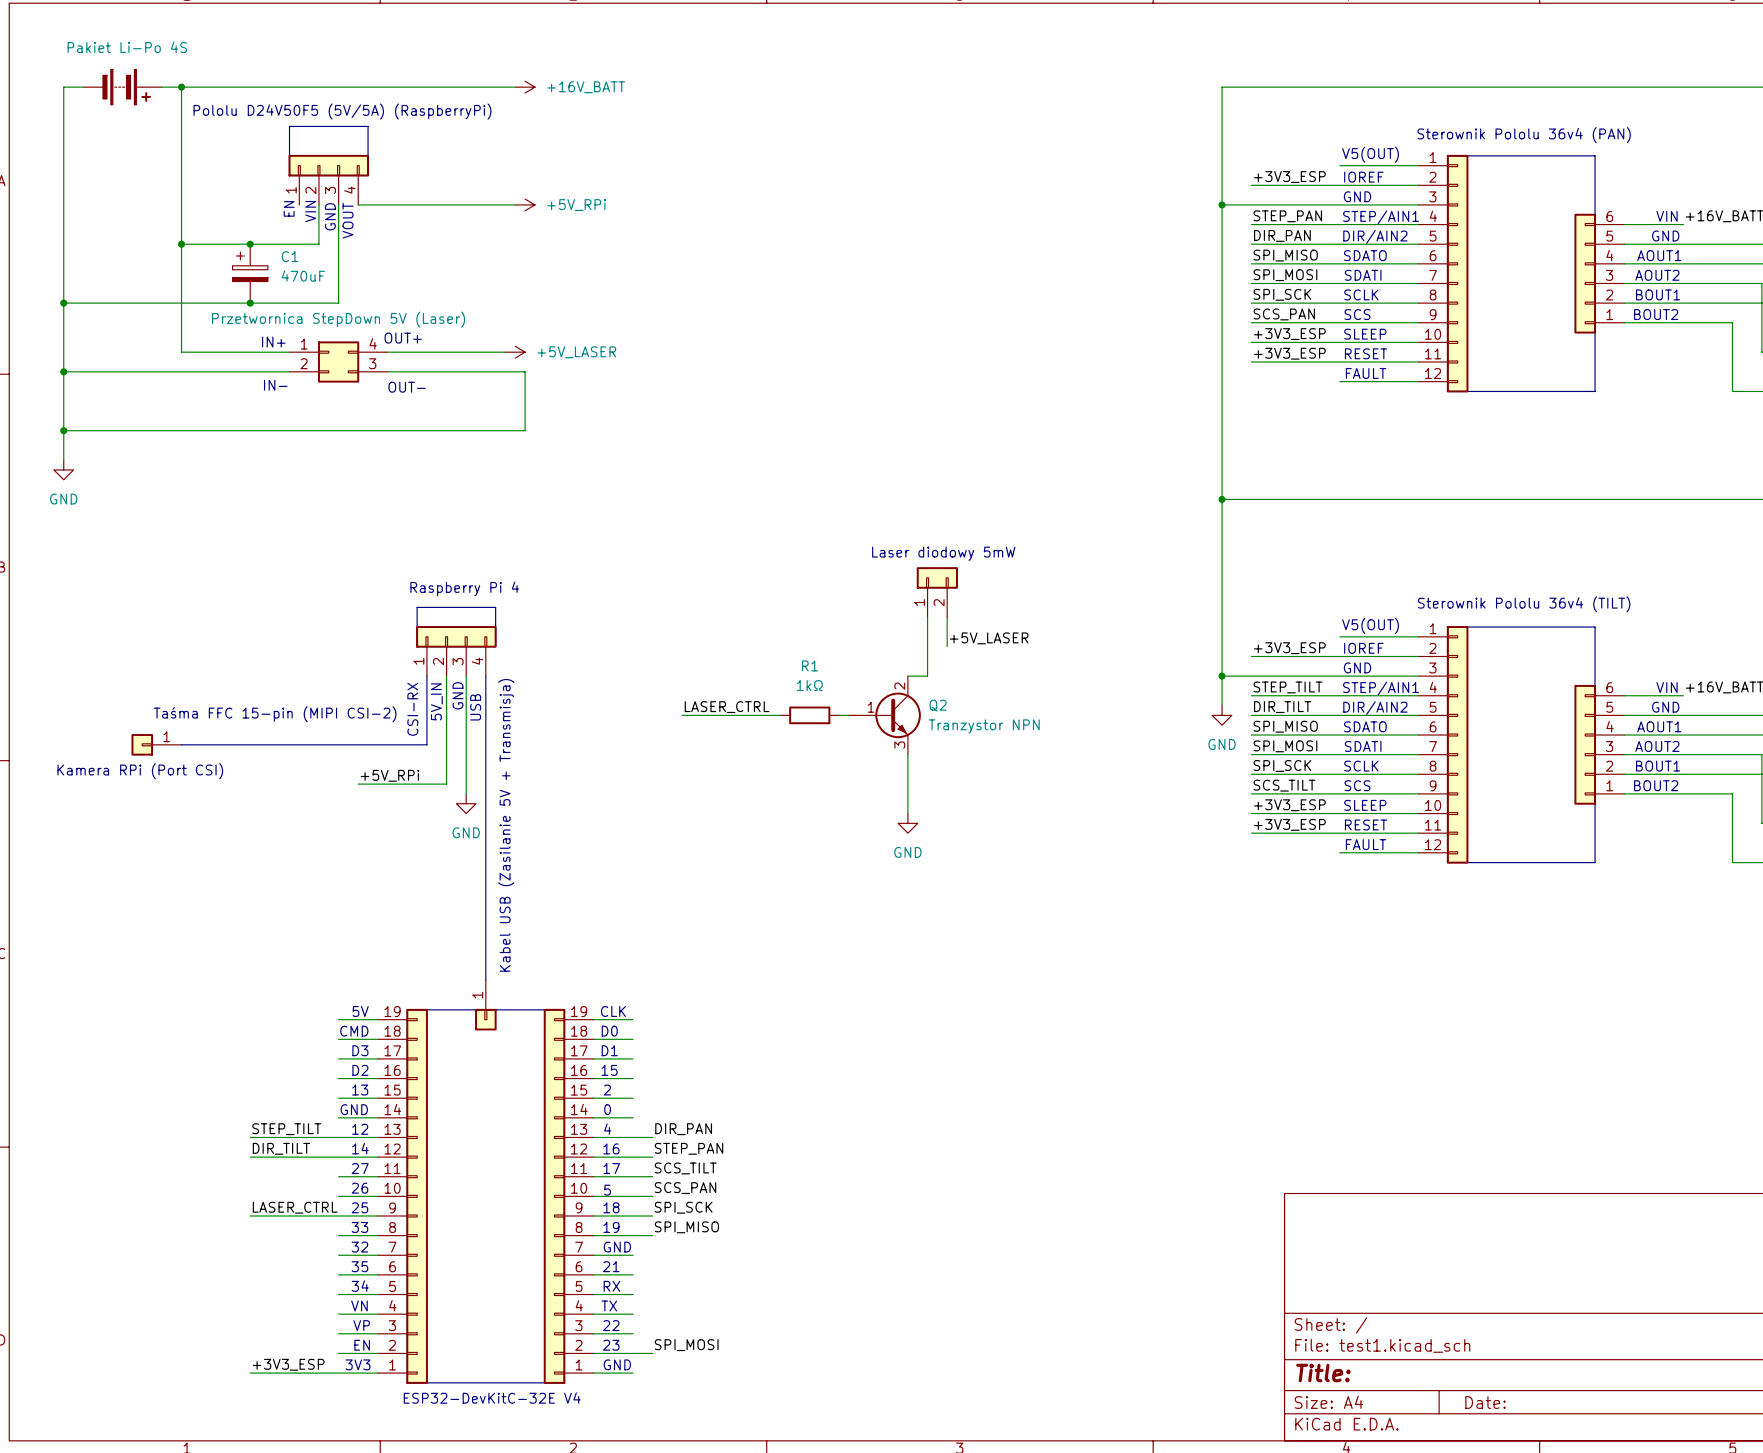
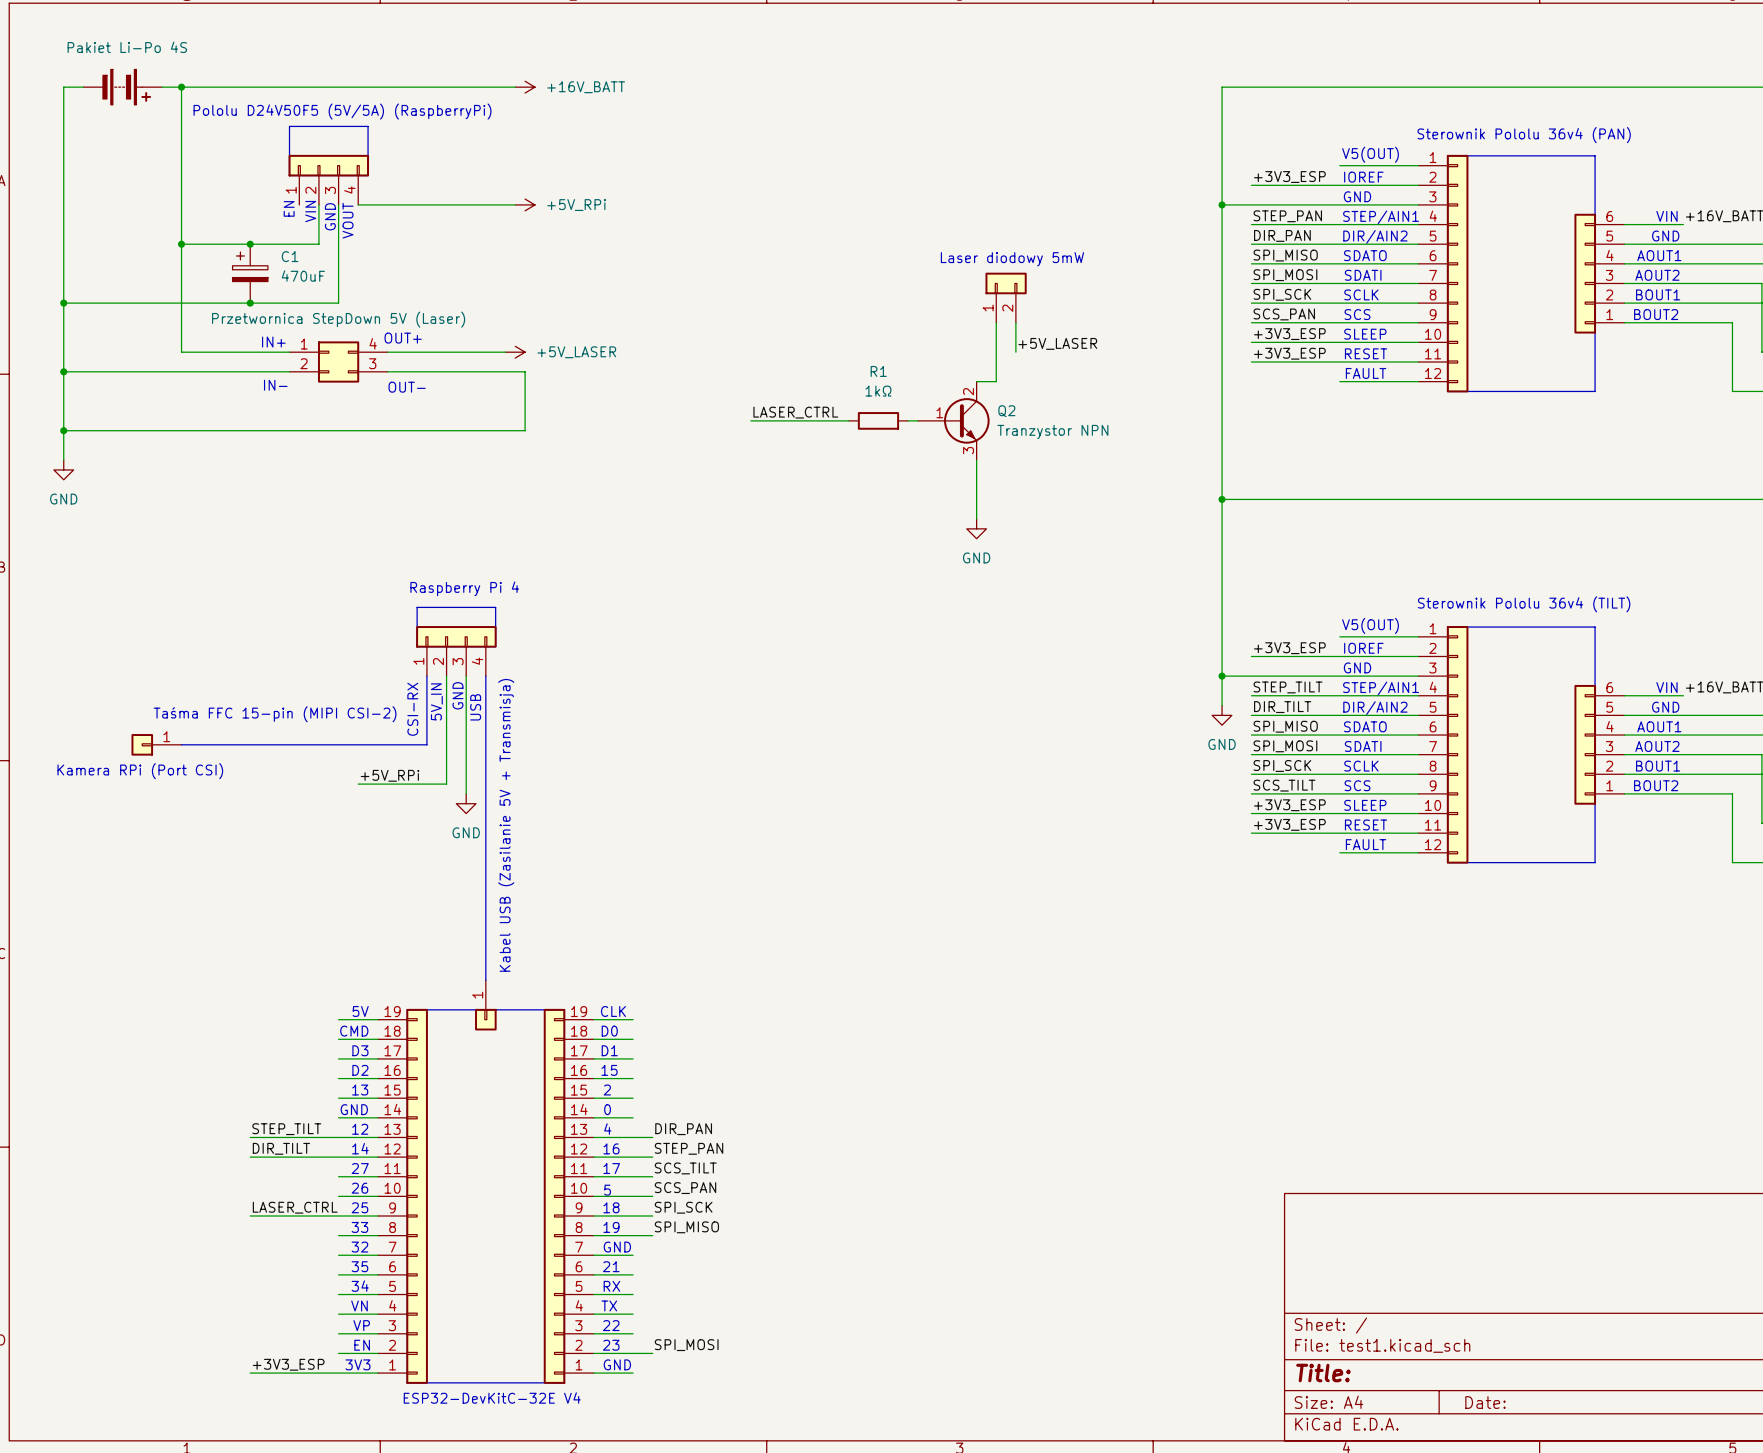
text: none -> Laser diodowy 5mW (1012, 259)
part: none -> (1006, 297)
wire: none -> (996, 322) (996, 381) (976, 381)
wire: none -> (1015, 322) (1015, 352)
label: none -> +5V_LASER (1057, 343)
label: none -> LASER_CTRL (795, 412)
wire: none -> (750, 420) (849, 420)
wire: none -> (907, 420) (917, 420)
wire: none -> (976, 460) (976, 519)
power symbol: none -> GND (976, 528)
text: Laser diodowy 5mW (943, 553) -> none
part: (937, 592) -> none
wire: (927, 617) (927, 676) (907, 676) -> none
wire: (947, 617) (947, 646) -> none
label: +5V_LASER (989, 638) -> none
label: LASER_CTRL (727, 707) -> none
wire: (682, 715) (780, 715) -> none
R1 position: (809, 715) -> (878, 420)
wire: (839, 715) (849, 715) -> none
Q2 position: (884, 715) -> (953, 420)
wire: (907, 754) (907, 813) -> none
power symbol: GND (907, 823) -> none

